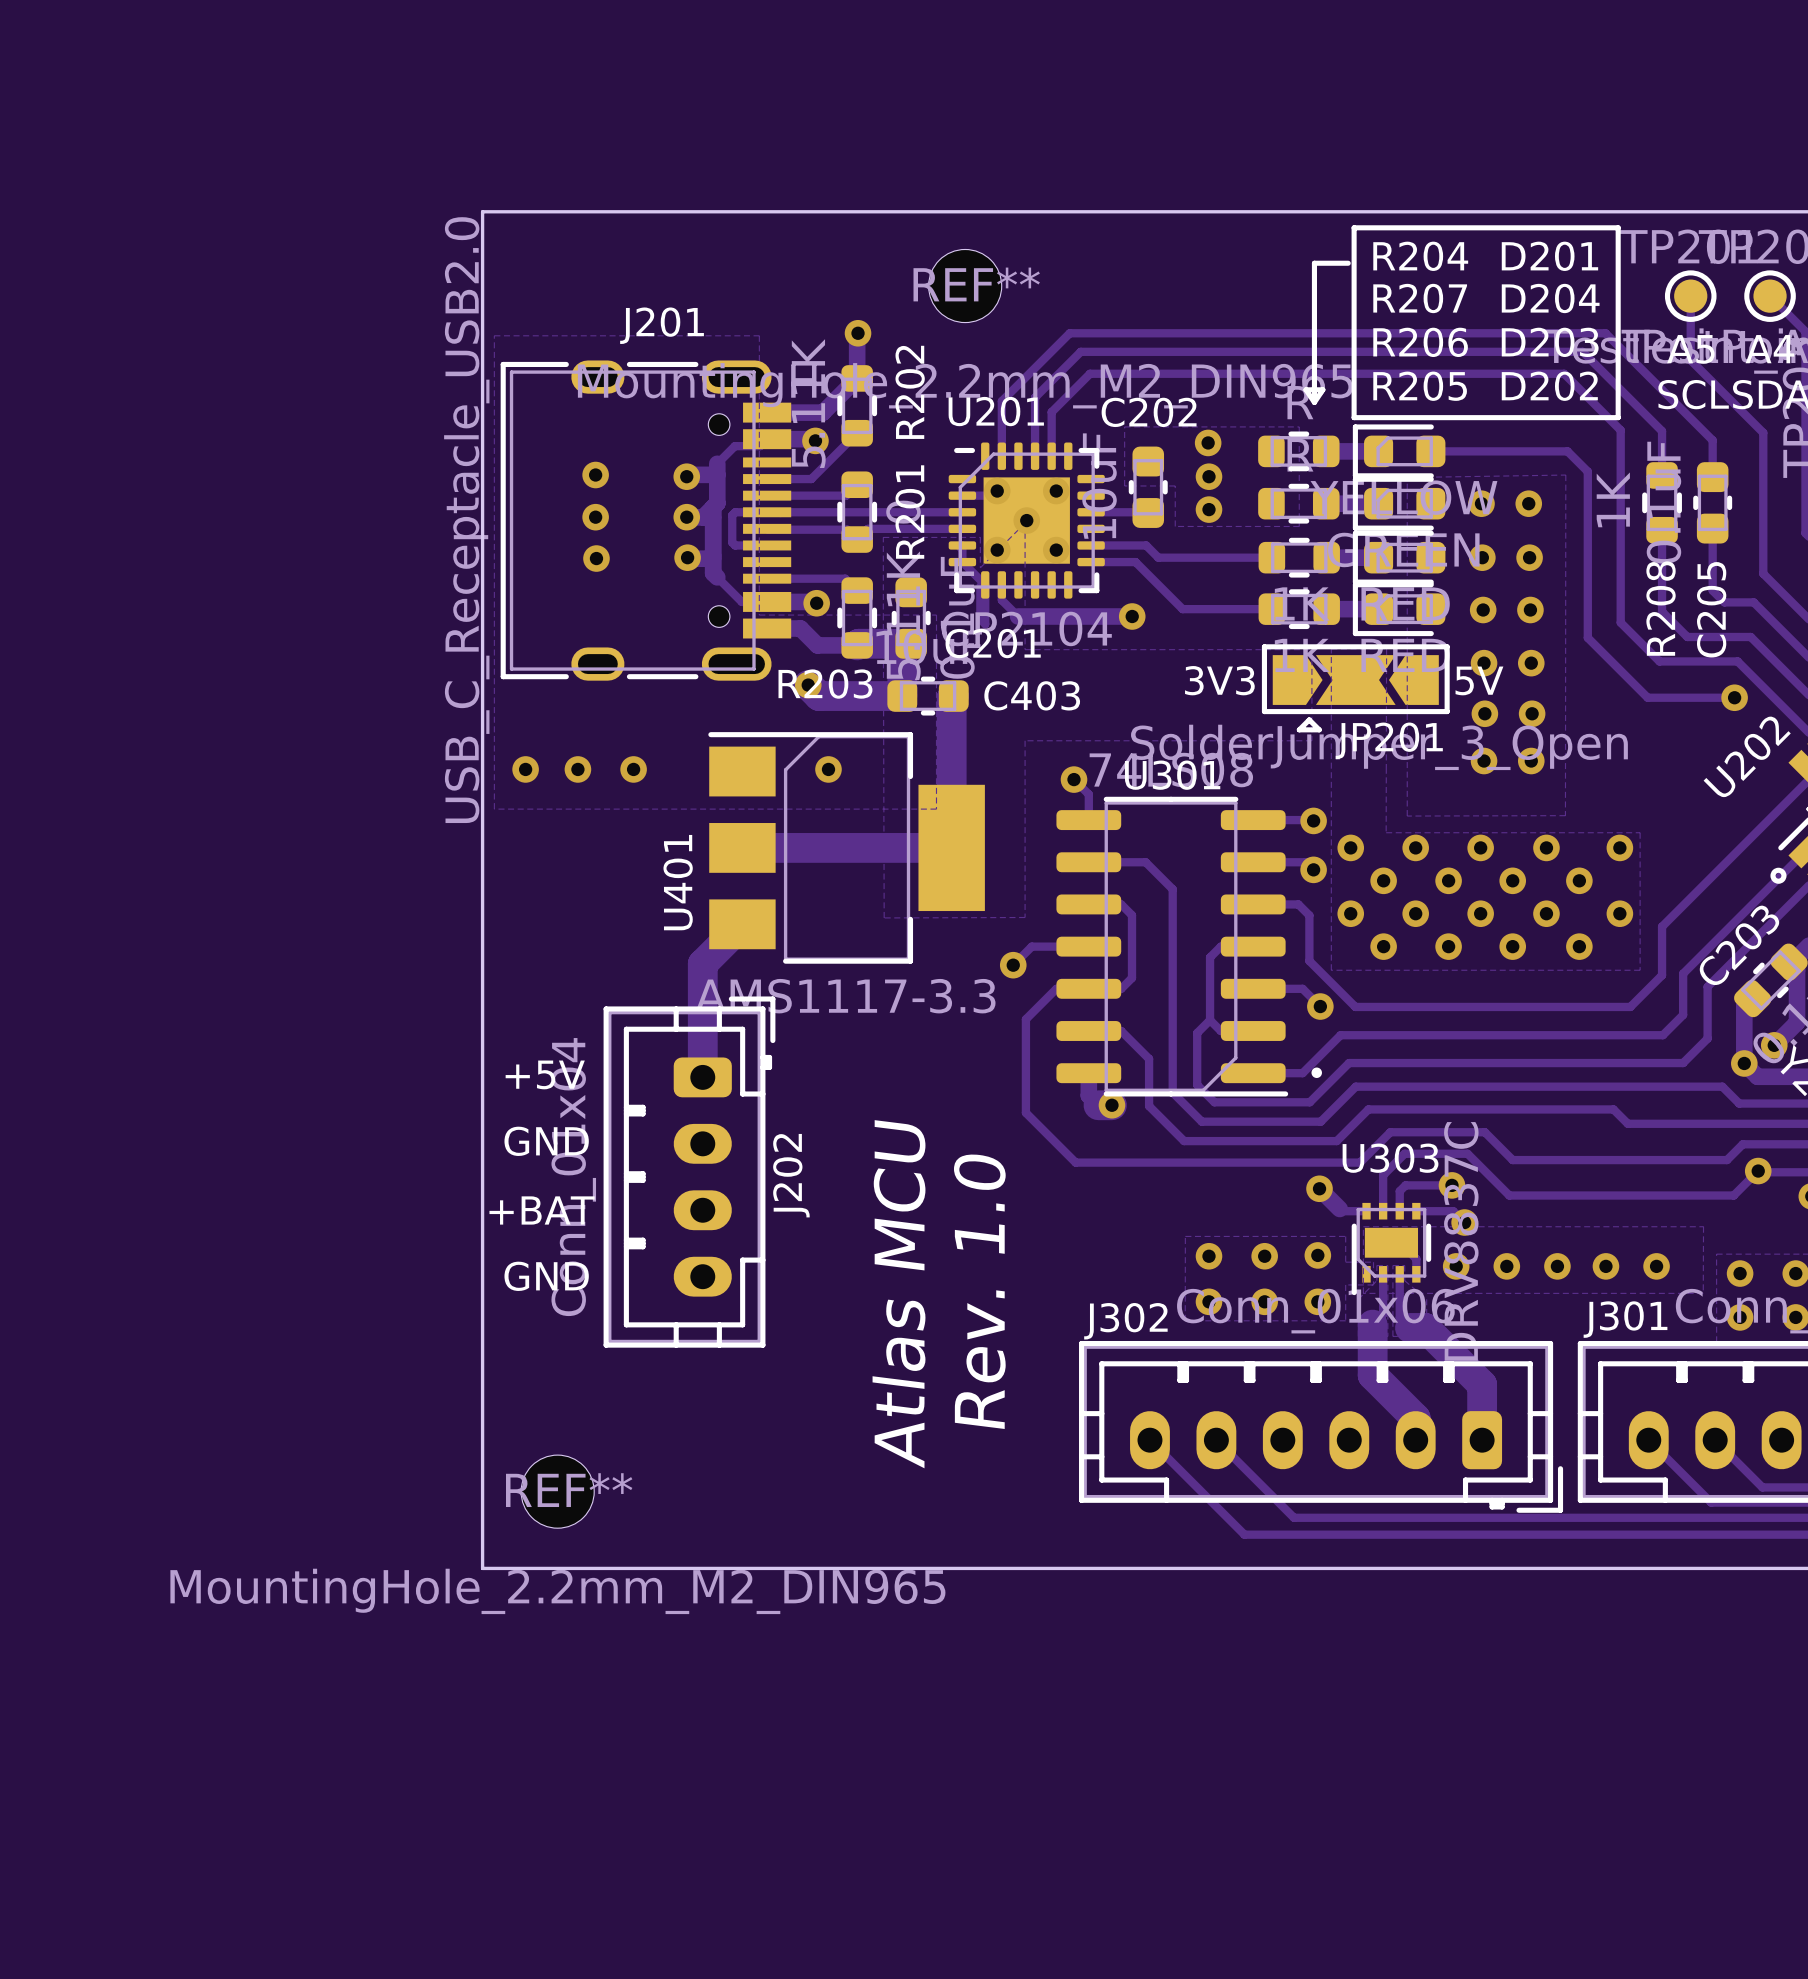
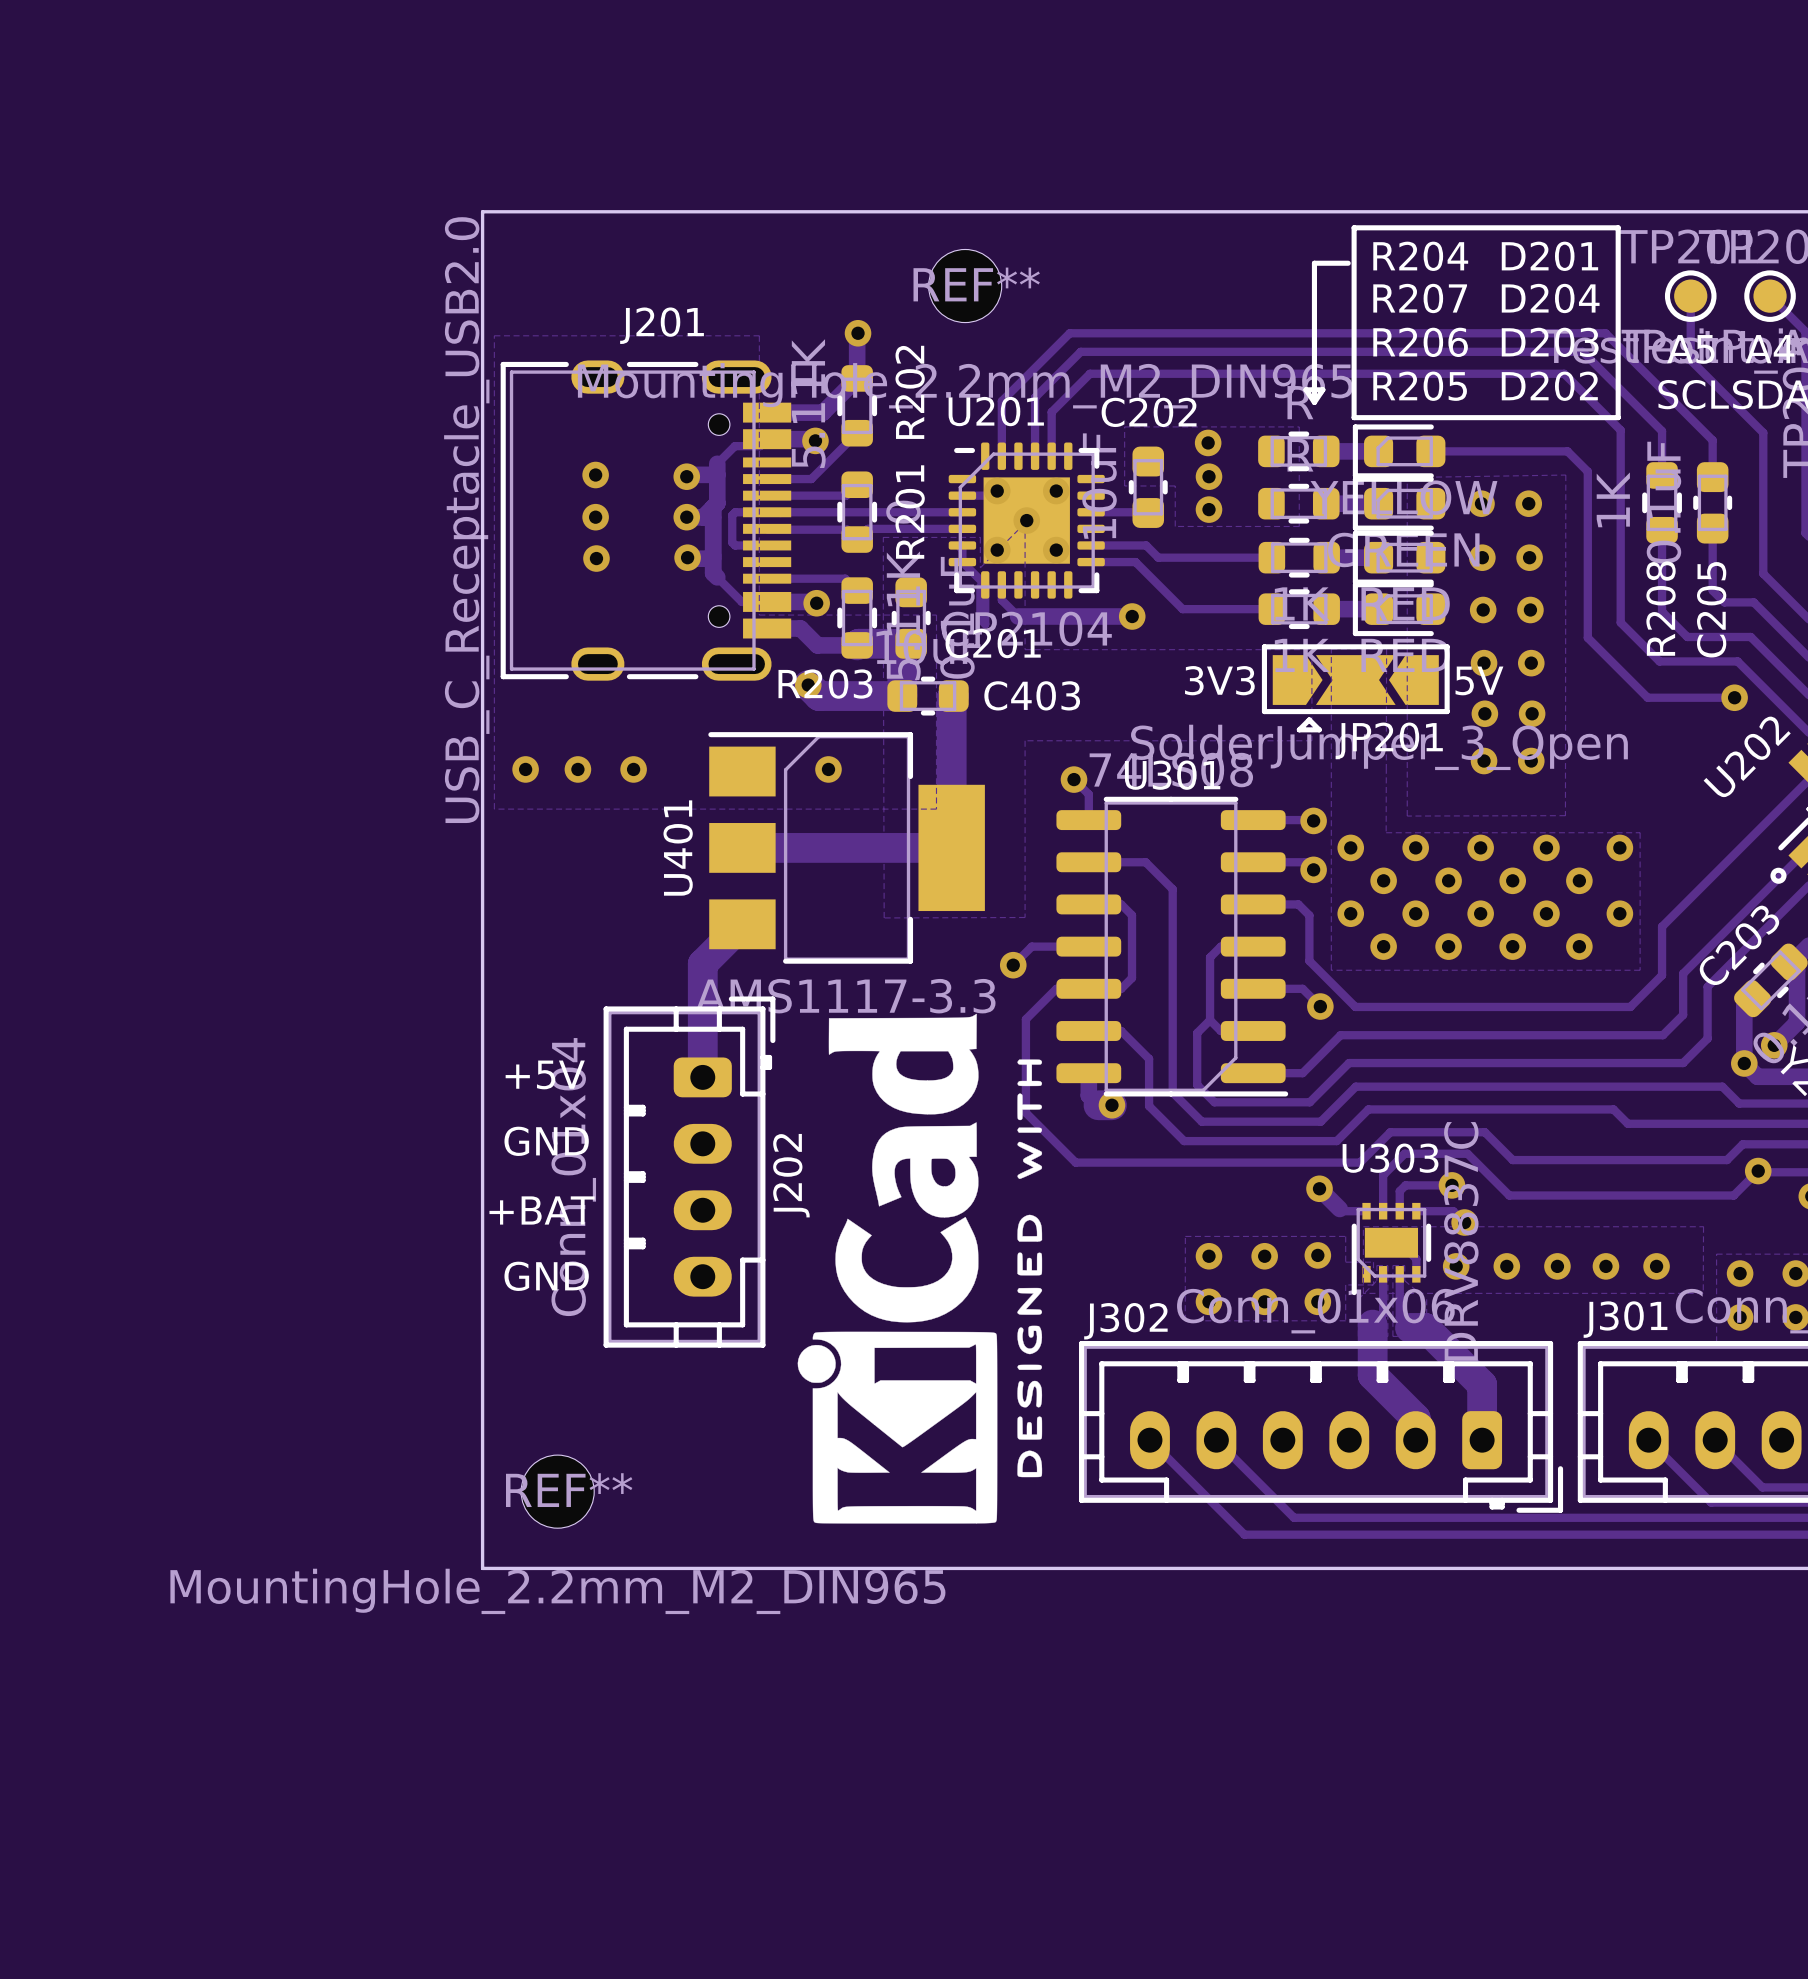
U401 name position: U401 (678, 882) -> U401 (678, 848)
drawing: none -> [797, 1013, 1043, 1524]
drawing: [1311, 1067, 1322, 1079] -> none
text: Rev. 1.0 (979, 1291) -> none
text: Atlas MCU (899, 1294) -> none

